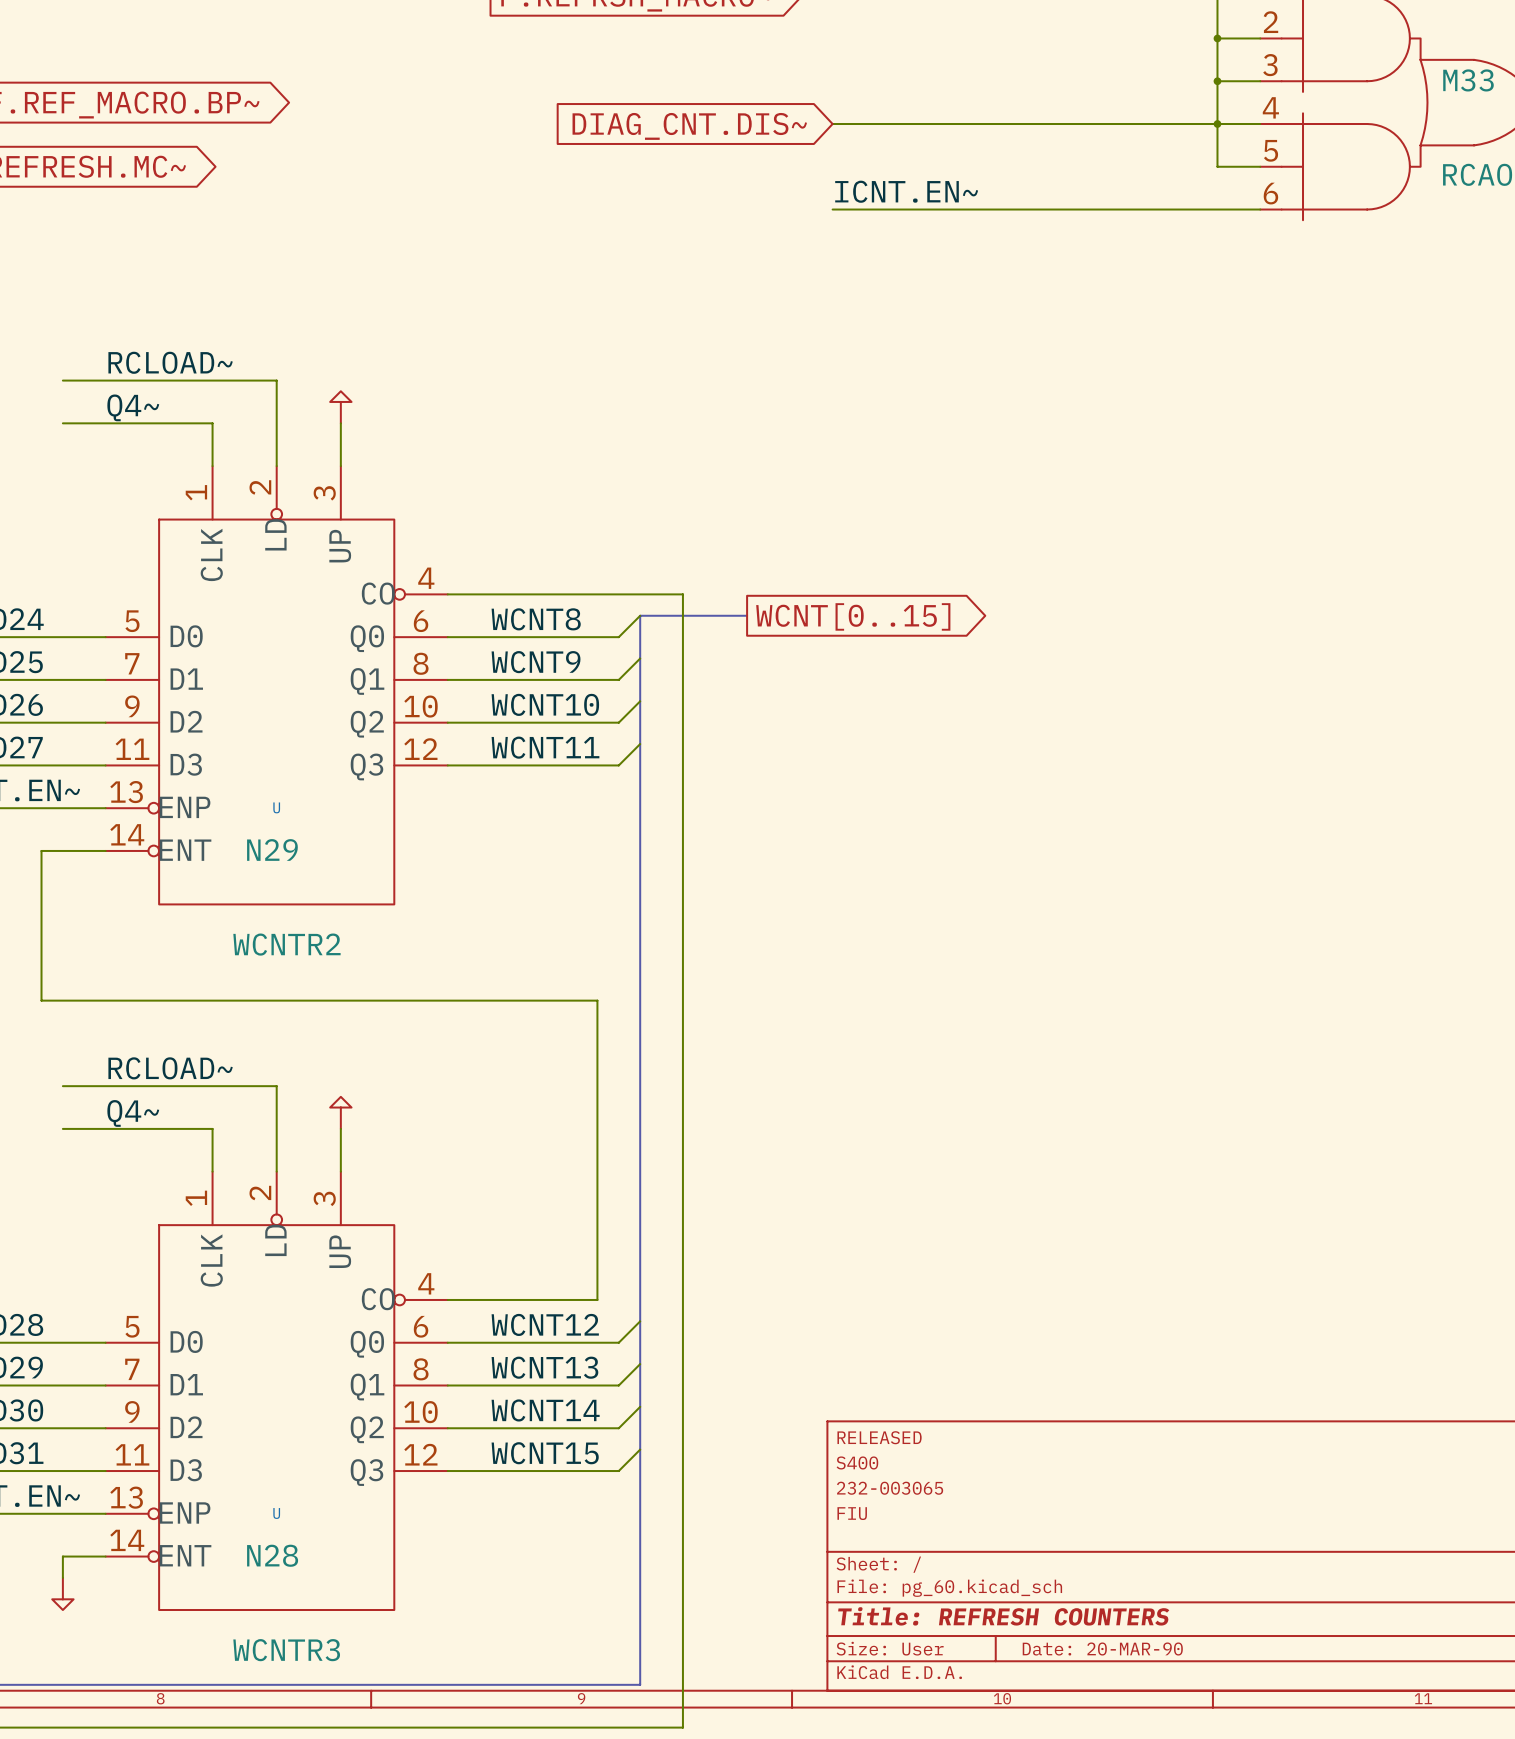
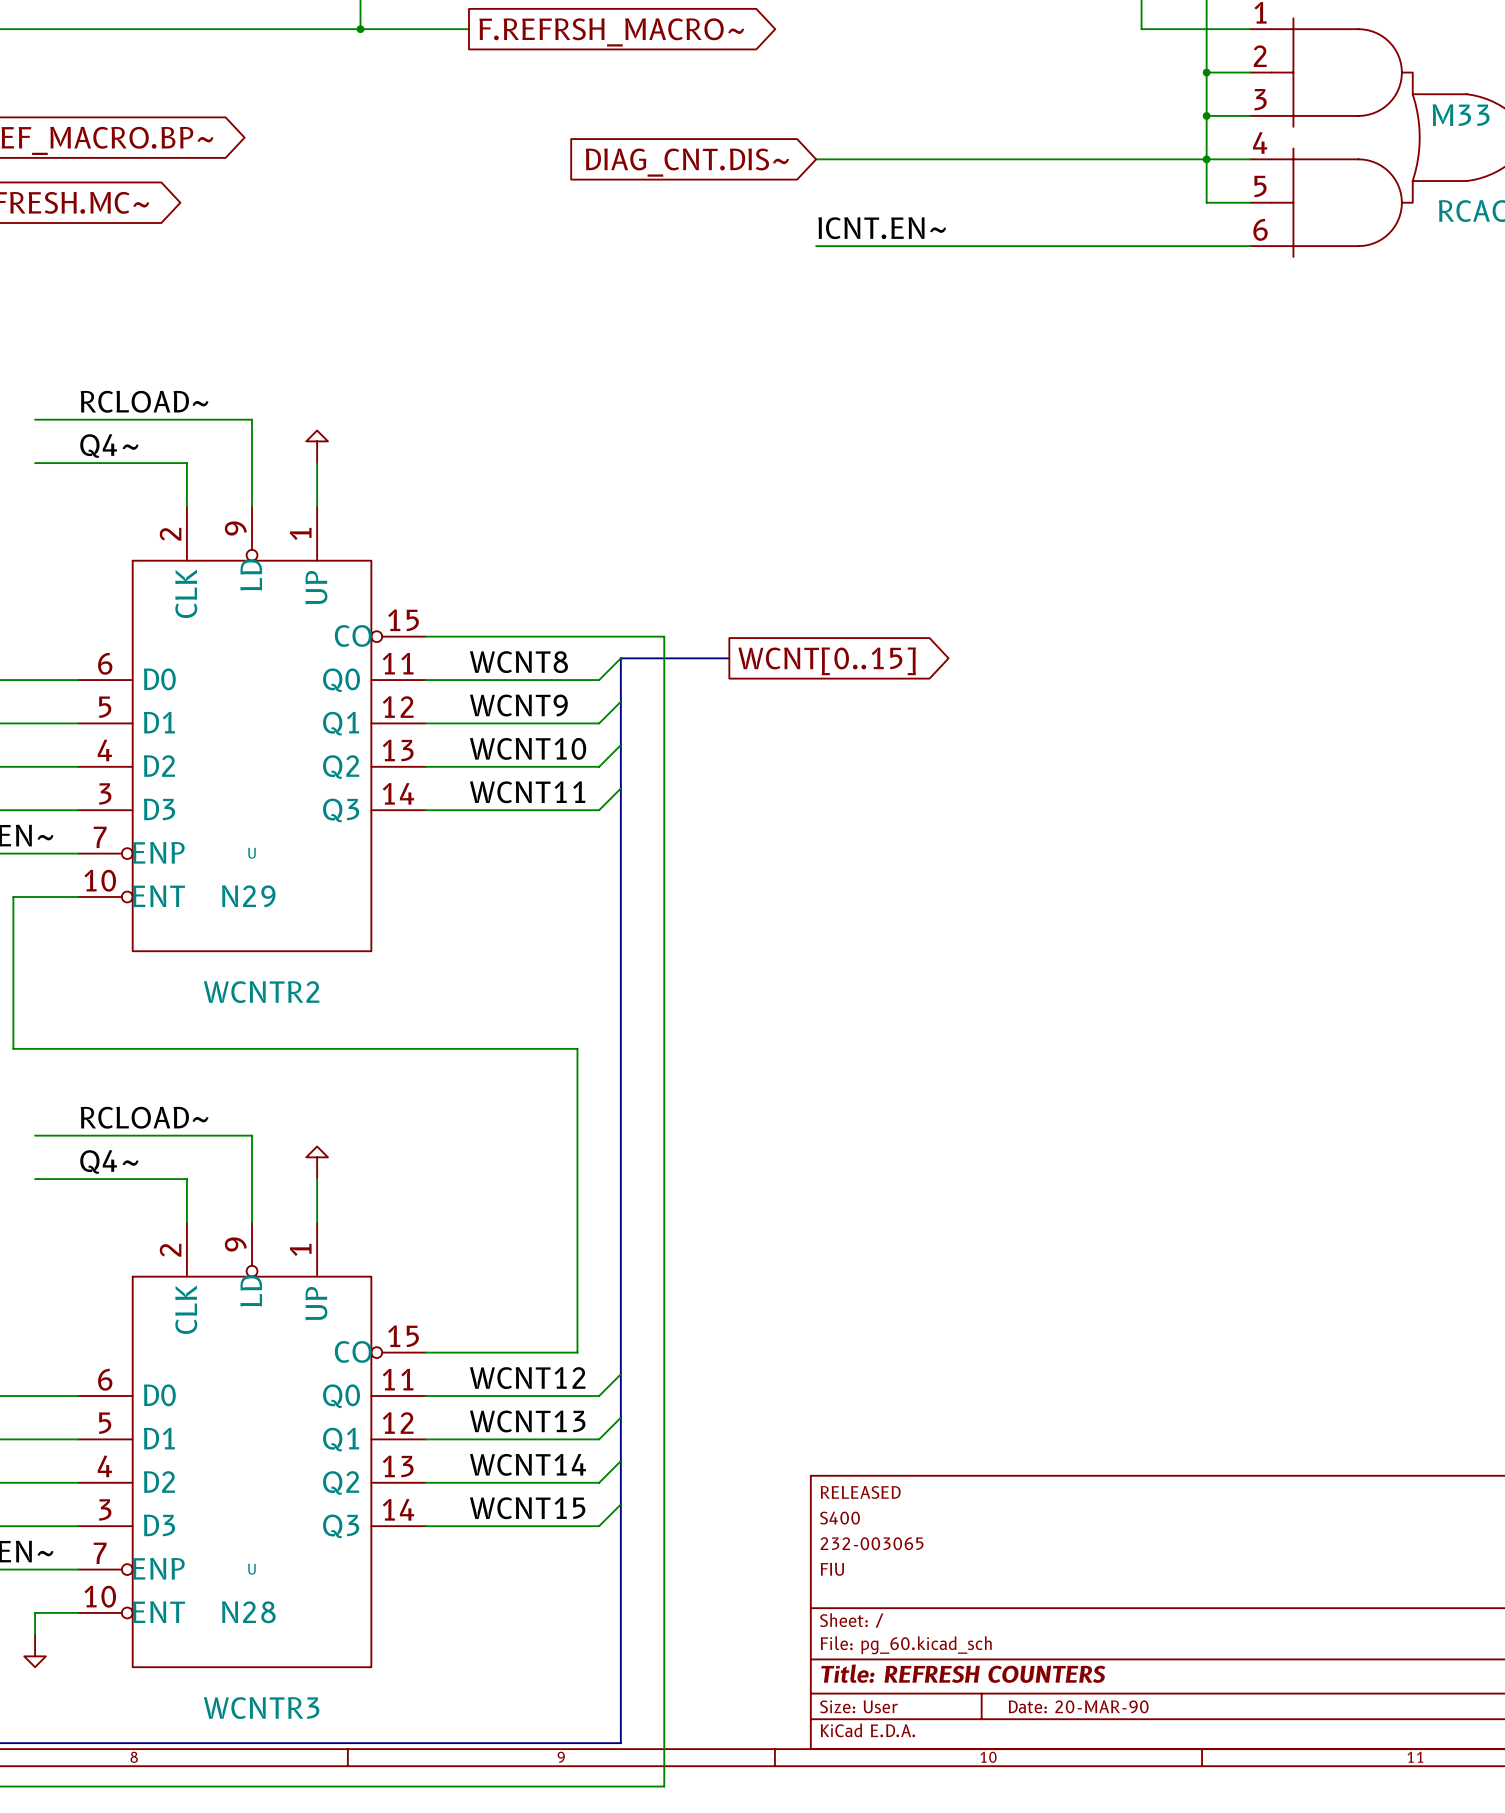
U symbol: [105, 466, 448, 905] -> [78, 506, 426, 952]
U symbol: [105, 1171, 448, 1611] -> [78, 1222, 426, 1668]

